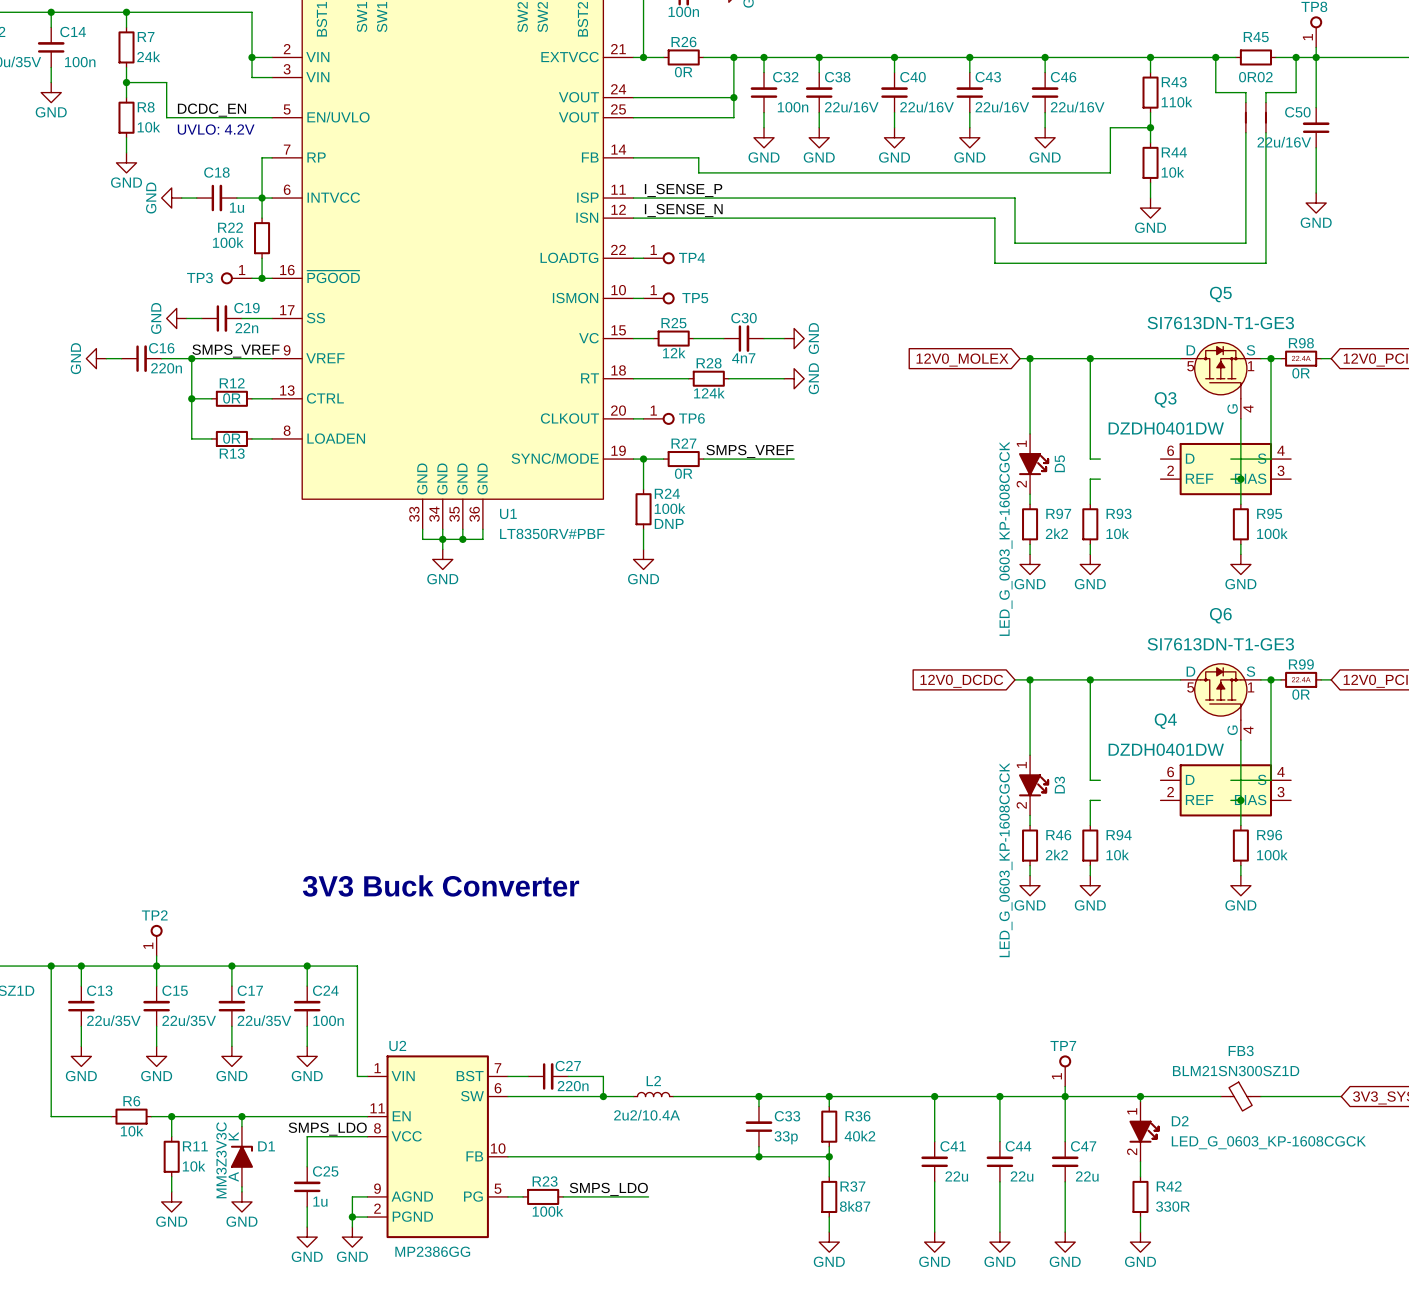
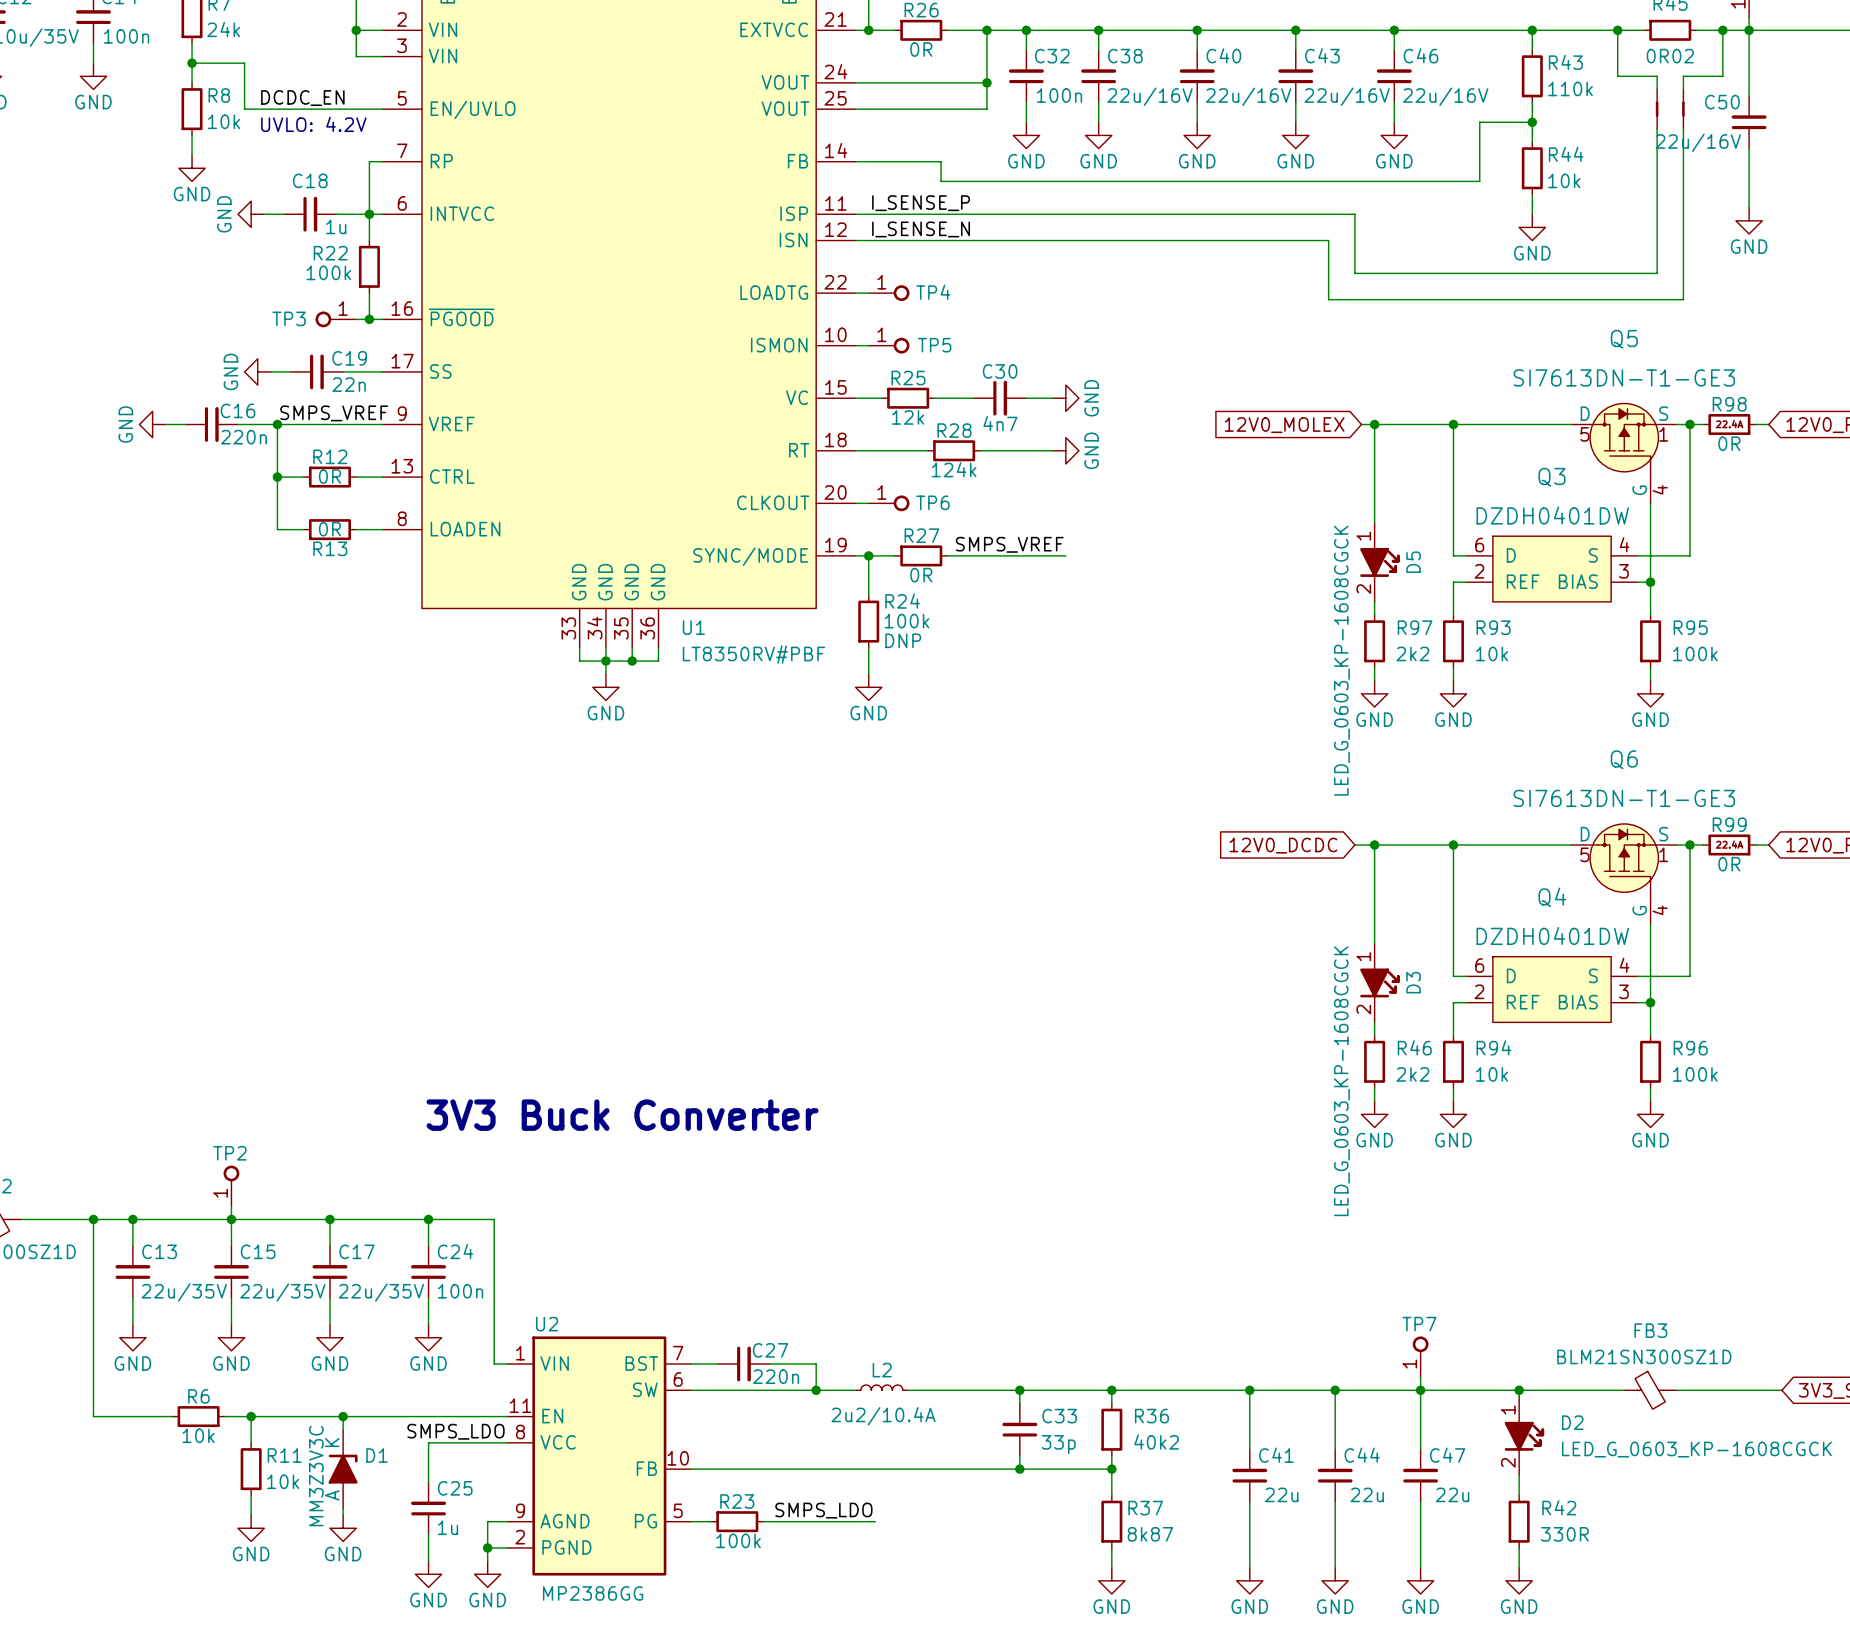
Q3 symbol: [1160, 442, 1292, 496] -> [1466, 536, 1638, 602]
Q4 symbol: [1160, 764, 1292, 817] -> [1466, 956, 1638, 1023]

